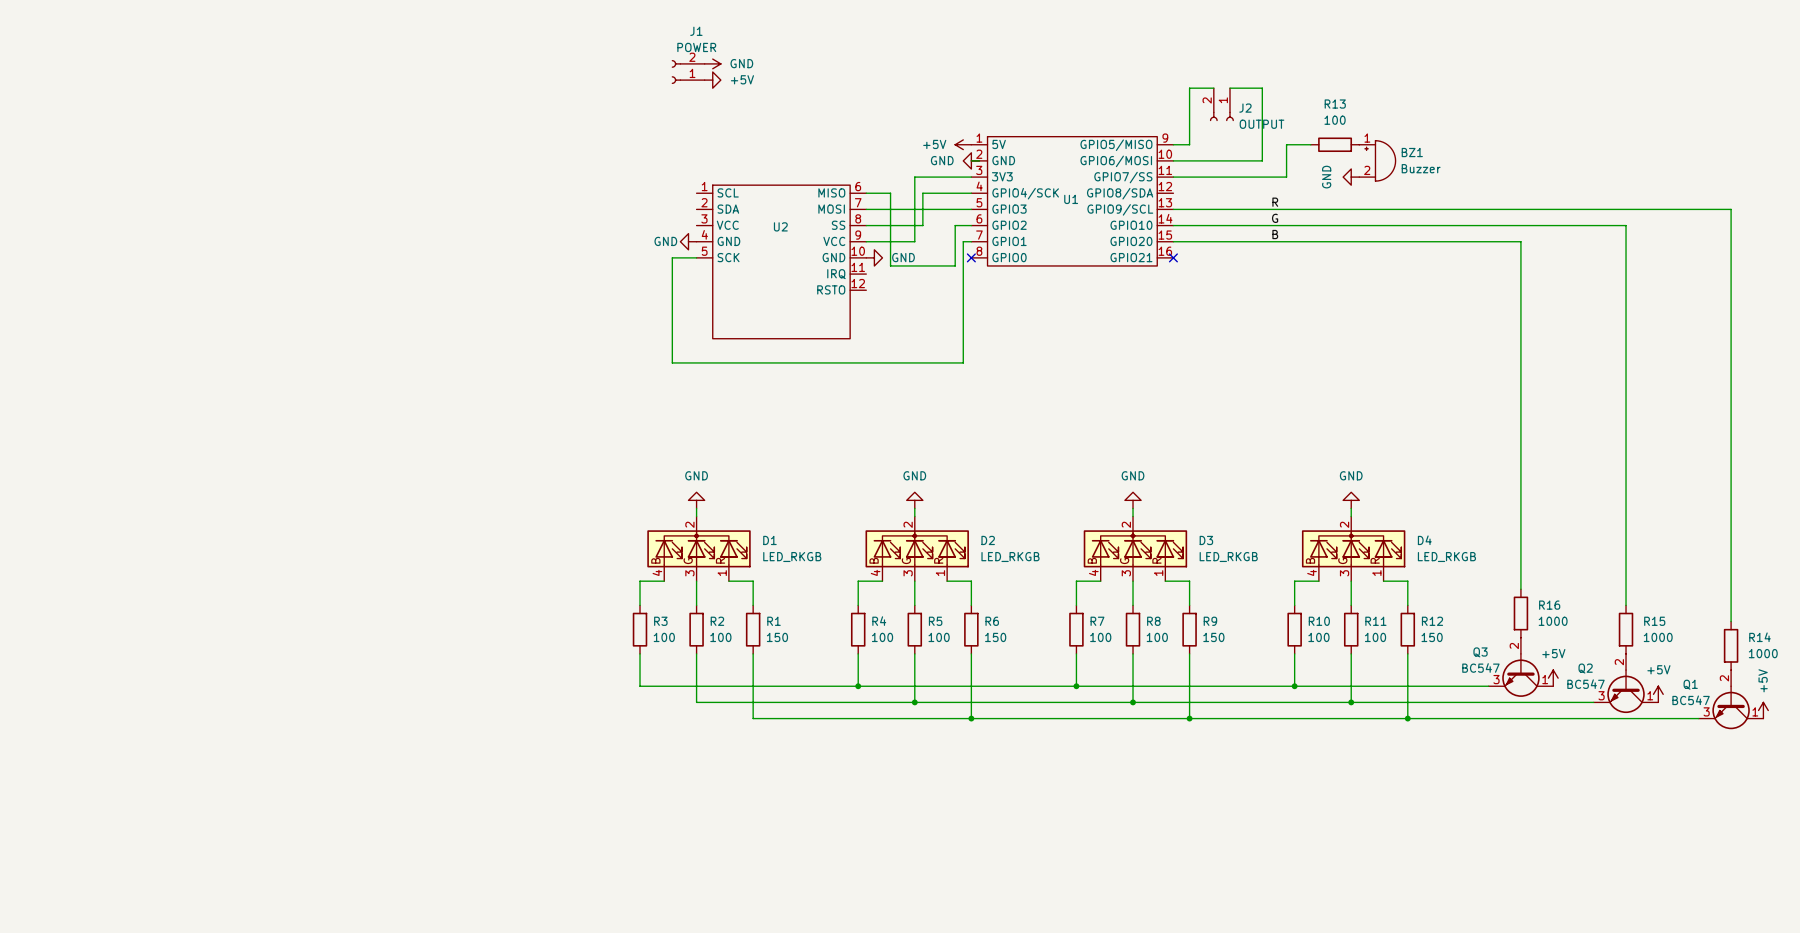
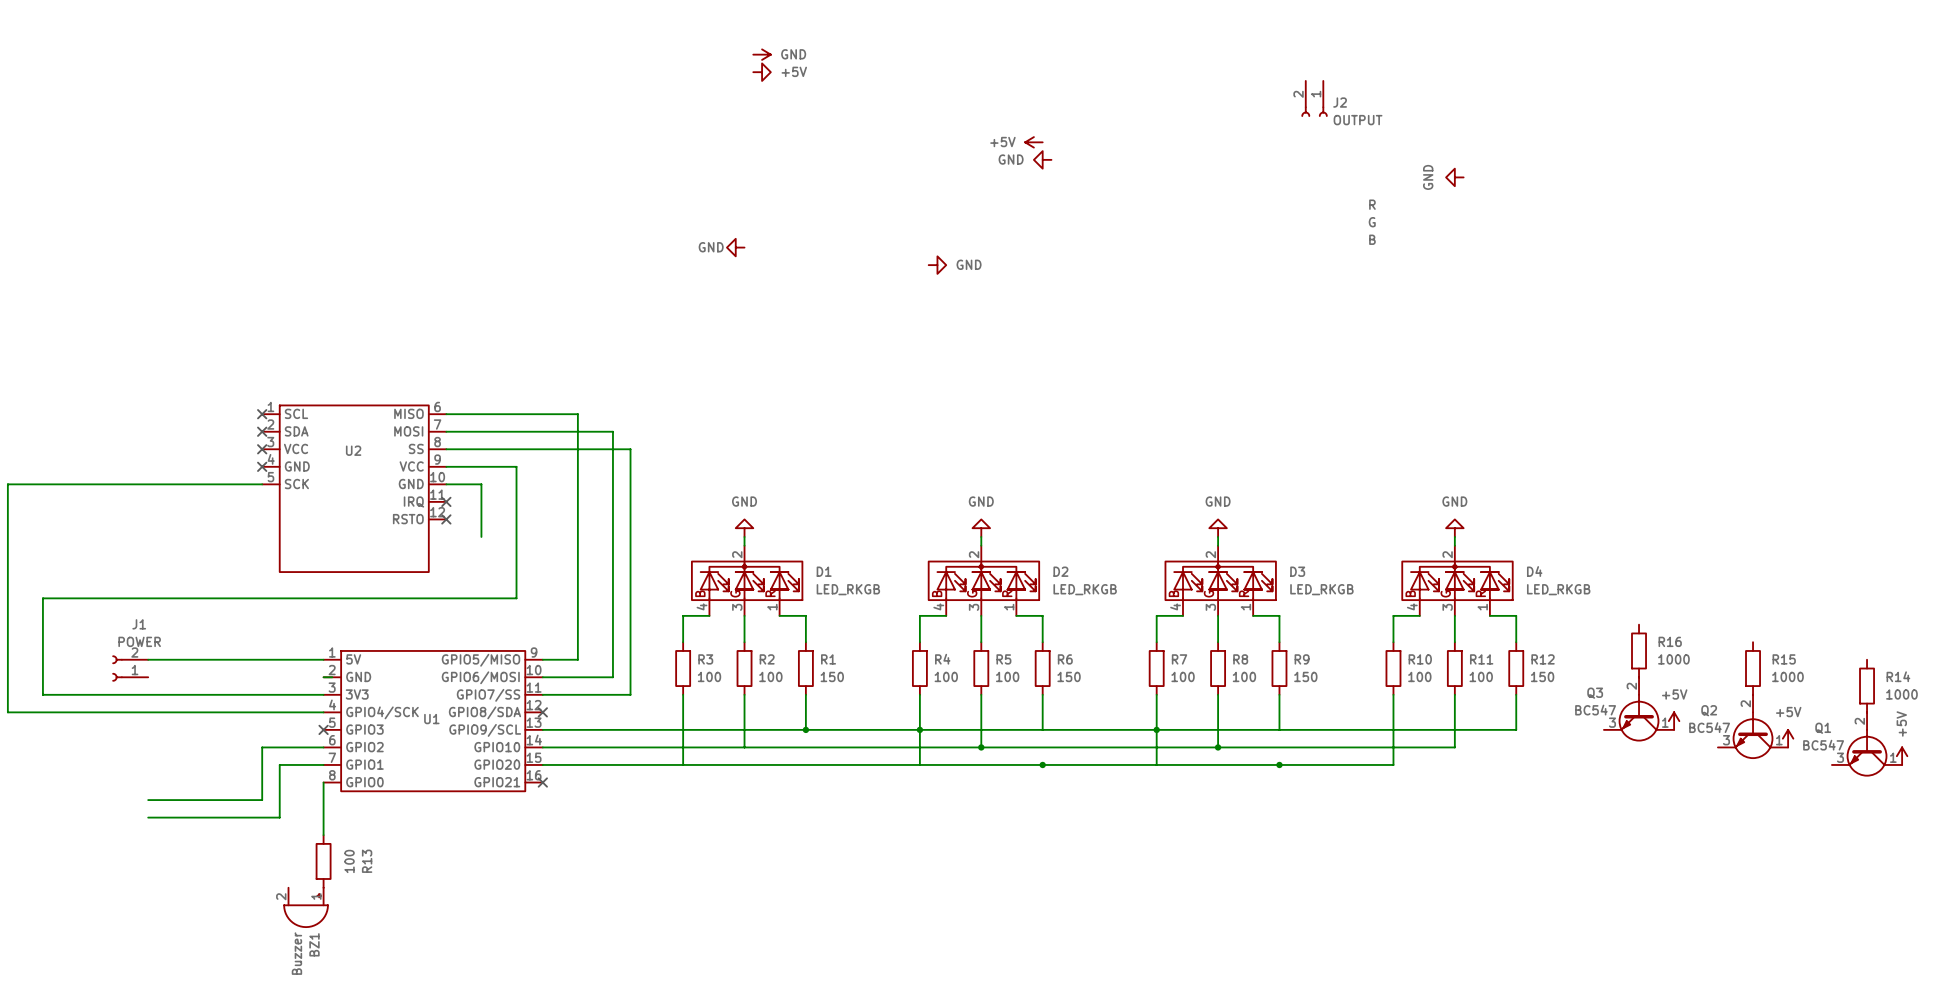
J1 position: (688, 72) -> (130, 668)
wire: (1213, 88) (1189, 88) (1189, 144) (1173, 144) -> none
wire: (1229, 88) (1262, 88) (1262, 160) (1173, 160) -> none
wire: (1310, 144) (1286, 144) (1286, 177) (1173, 177) -> none
R13 rotation: 0° (1335, 144) -> 90° clockwise (323, 861)
R13 position: (1335, 144) -> (323, 861)
BZ1 position: (1377, 160) -> (306, 907)
BZ1 rotation: 0° (1380, 160) -> 90° clockwise (306, 910)
wire: (971, 177) (914, 177) (914, 241) (866, 241) -> none
wire: (866, 193) (890, 193) (890, 265) (955, 265) (955, 225) (971, 225) -> none
wire: (971, 193) (922, 193) (922, 225) (866, 225) -> none
U1 position: (1072, 201) -> (433, 721)
wire: (866, 209) (971, 209) -> none
wire: (1173, 209) (1731, 209) (1731, 621) -> none
wire: (1173, 225) (1626, 225) (1626, 605) -> none
wire: (971, 241) (963, 241) (963, 362) (672, 362) (672, 257) (696, 257) -> none
wire: (1173, 241) (1520, 241) (1520, 589) -> none
no-connect mark: (971, 257) -> none
no-connect mark: (1173, 257) -> none
U2 position: (781, 261) -> (354, 488)
no-connect mark: none -> (262, 414)
wire: none -> (446, 414) (577, 414) (577, 659) (542, 659)
no-connect mark: none -> (262, 431)
wire: none -> (446, 431) (612, 431) (612, 677) (542, 677)
no-connect mark: none -> (262, 449)
wire: none -> (446, 449) (630, 449) (630, 694) (542, 694)
no-connect mark: none -> (262, 466)
wire: none -> (446, 466) (516, 466) (516, 598) (42, 598) (42, 694) (323, 694)
wire: none -> (262, 484) (7, 484) (7, 712) (323, 712)
wire: none -> (446, 484) (481, 484) (481, 536)
no-connect mark: none -> (446, 501)
no-connect mark: none -> (446, 519)
wire: none -> (148, 659) (323, 659)
wire: none -> (323, 677) (332, 677)
no-connect mark: none -> (542, 712)
no-connect mark: none -> (323, 729)
wire: none -> (542, 729) (683, 729) (683, 764)
wire: (753, 686) (753, 718) -> (542, 764) (805, 764)
junction: none -> (805, 729)
wire: none -> (919, 729) (919, 764)
wire: (971, 686) (971, 718) -> (1156, 729) (1156, 764)
wire: (1189, 686) (1189, 718) -> none
junction: (1294, 686) -> none
wire: (1488, 686) (1407, 686) (1407, 718) -> none
wire: none -> (323, 747) (262, 747) (262, 800) (148, 800)
wire: none -> (542, 747) (744, 747)
wire: (1351, 702) (1593, 702) -> none
junction: (1351, 702) -> none
wire: none -> (323, 764) (279, 764) (279, 817) (148, 817)
wire: (1294, 718) (1698, 718) -> (1393, 764) (1393, 729)
junction: (1407, 718) -> none
wire: none -> (323, 782) (323, 835)
no-connect mark: none -> (542, 782)

